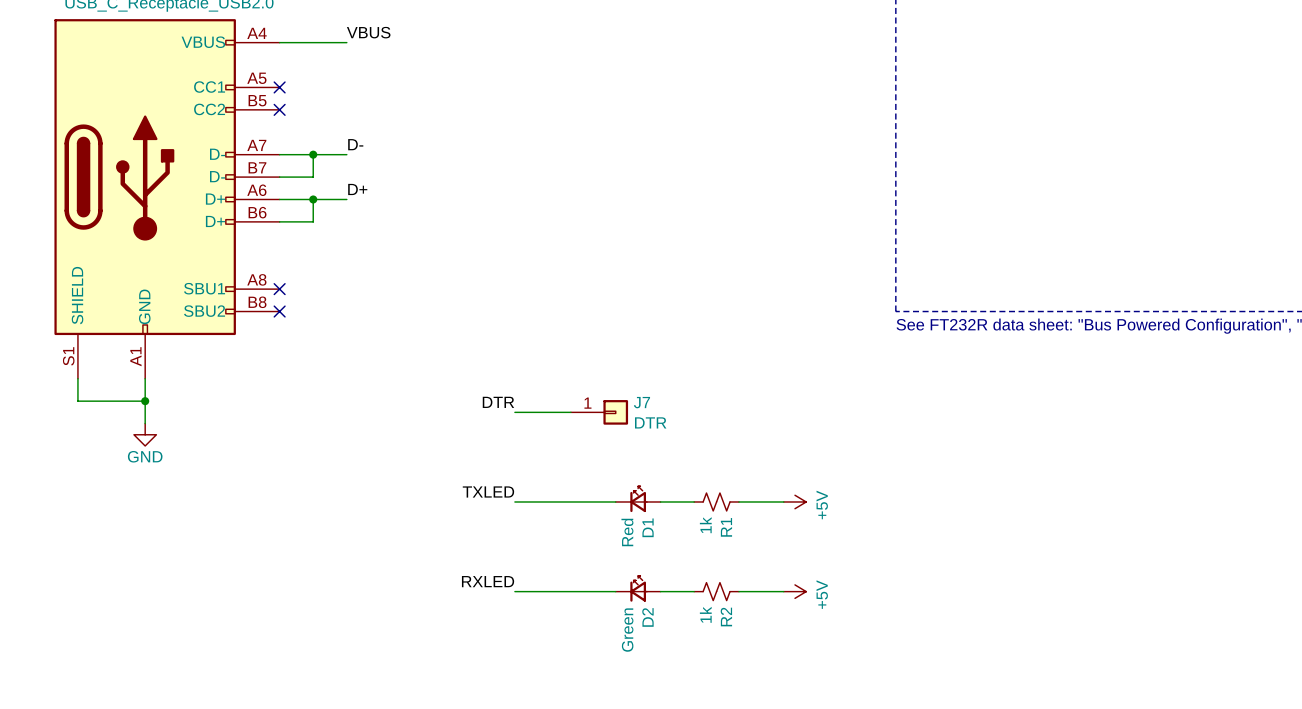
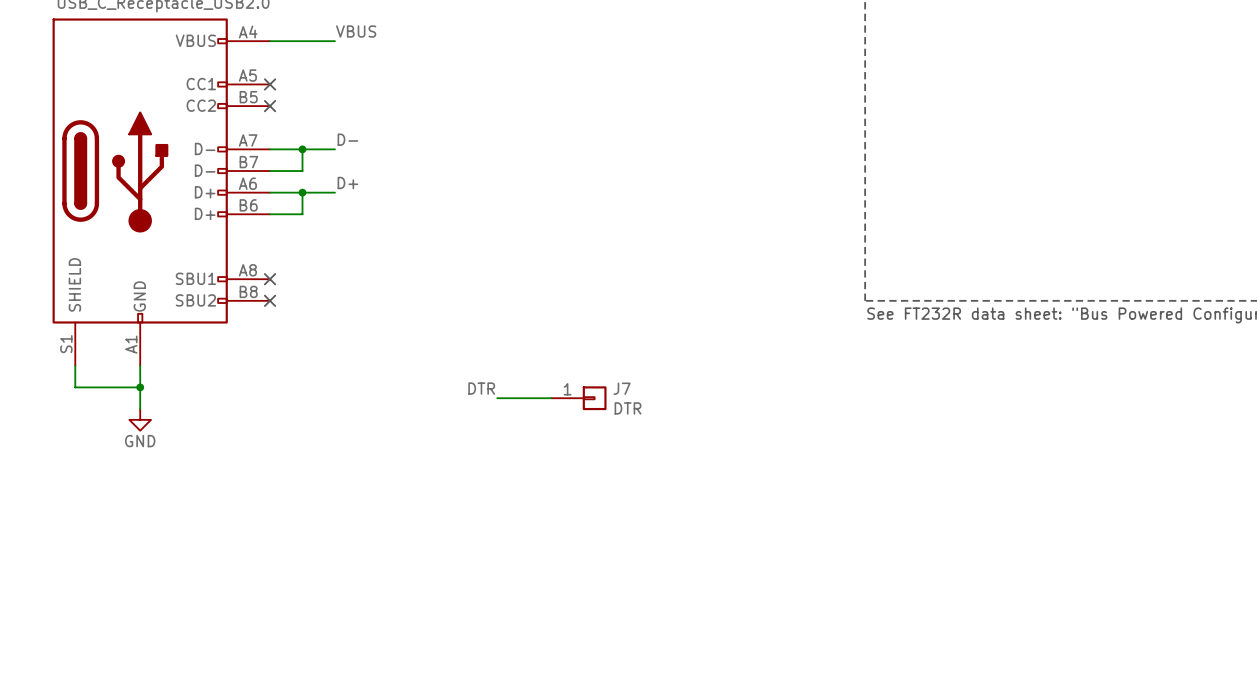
label: TXLED (488, 491) -> none
D1: Red (638, 499) -> none
wire: (514, 501) (615, 501) -> none
wire: (660, 501) (694, 501) -> none
R1: 1k (716, 501) -> none
wire: (738, 501) (783, 501) -> none
power symbol: +5V (795, 501) -> none
label: RXLED (488, 581) -> none
D2: Green (638, 588) -> none
wire: (514, 591) (615, 591) -> none
wire: (660, 591) (694, 591) -> none
R2: 1k (716, 591) -> none
wire: (738, 591) (783, 591) -> none
power symbol: +5V (795, 591) -> none

